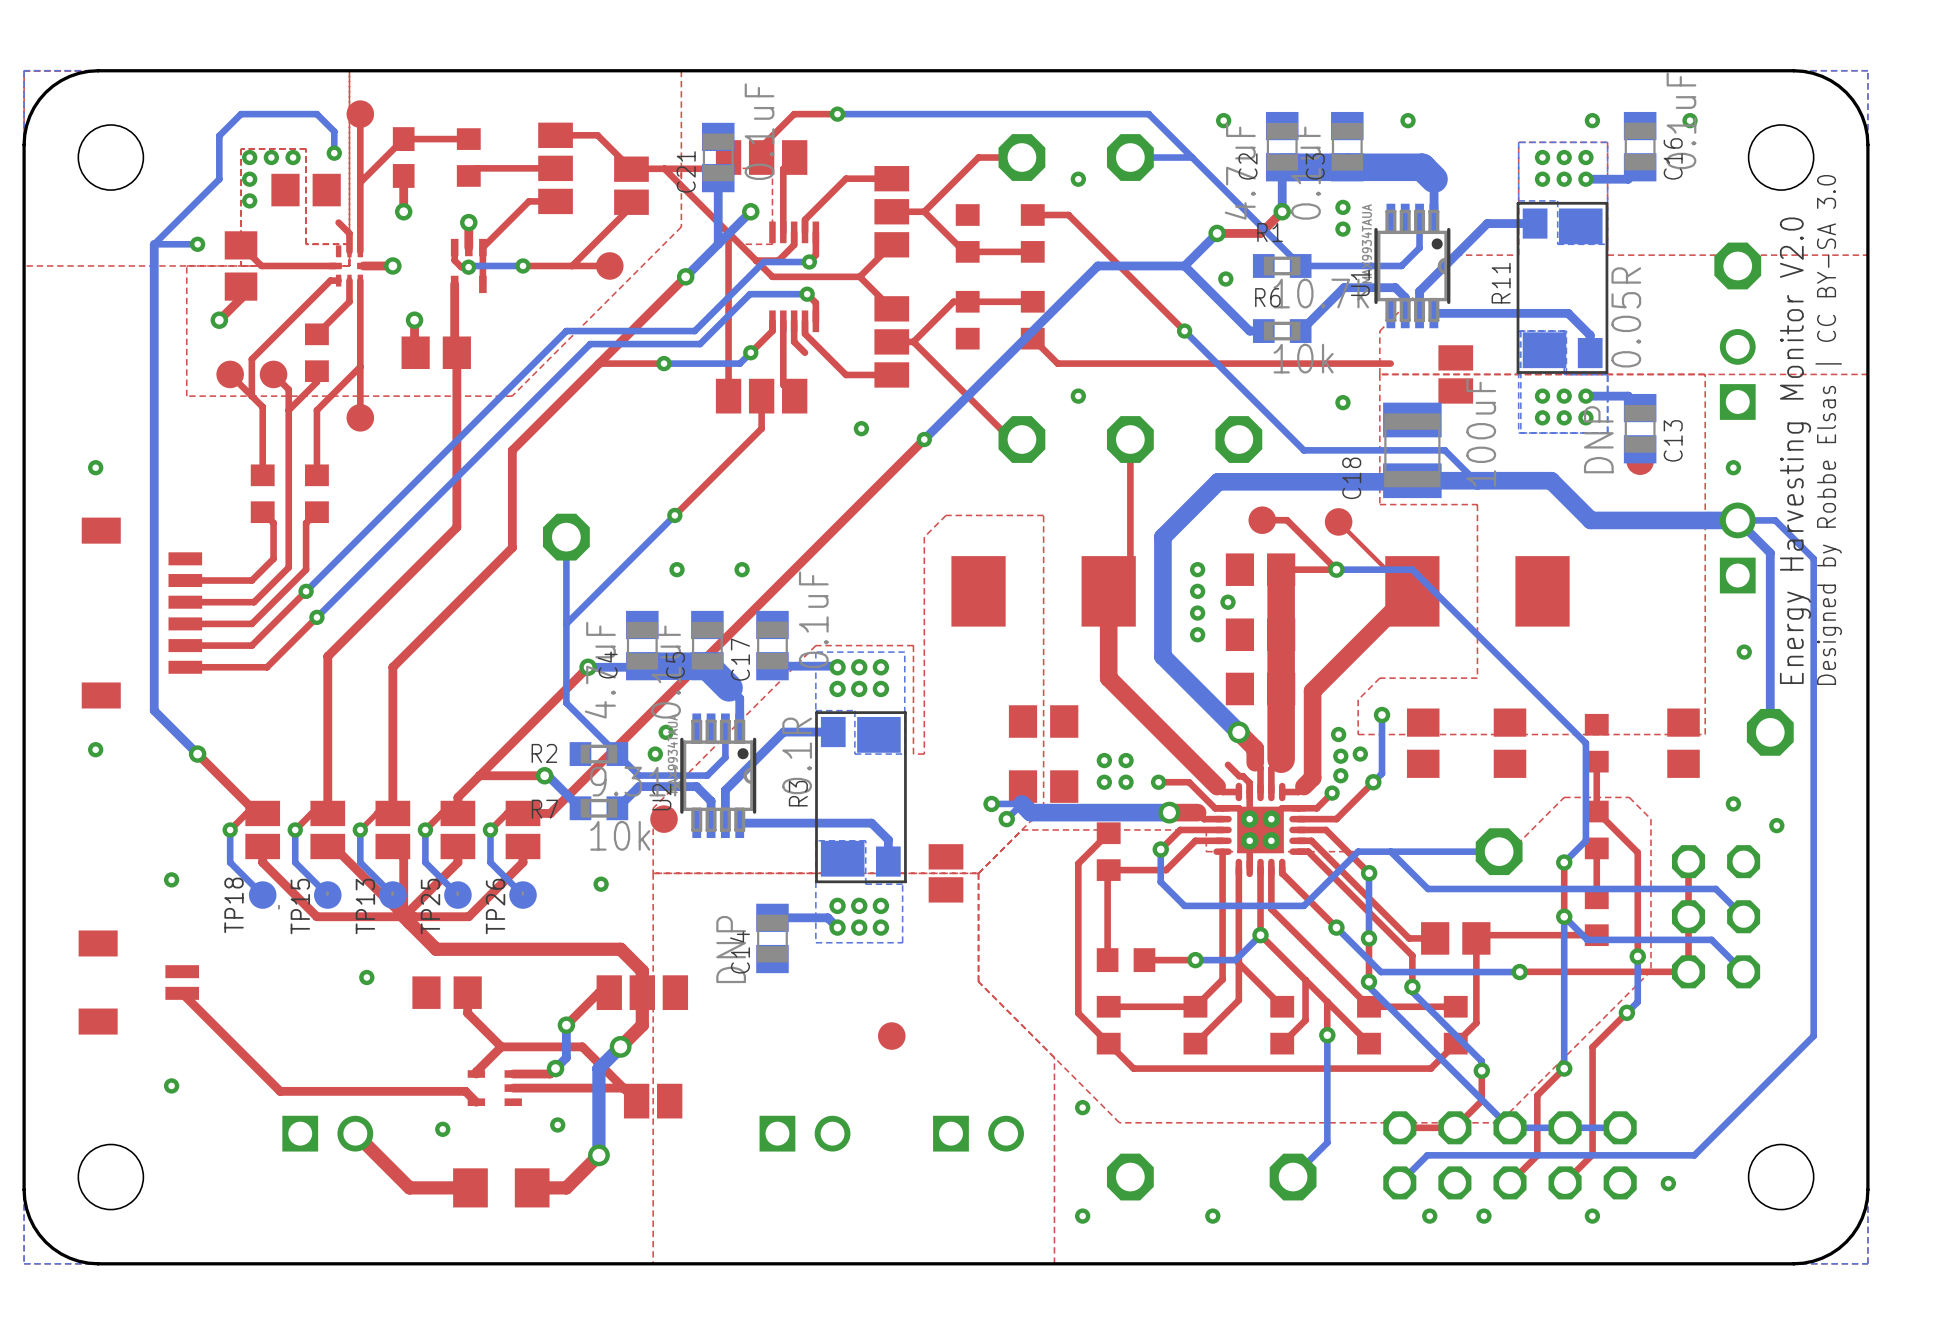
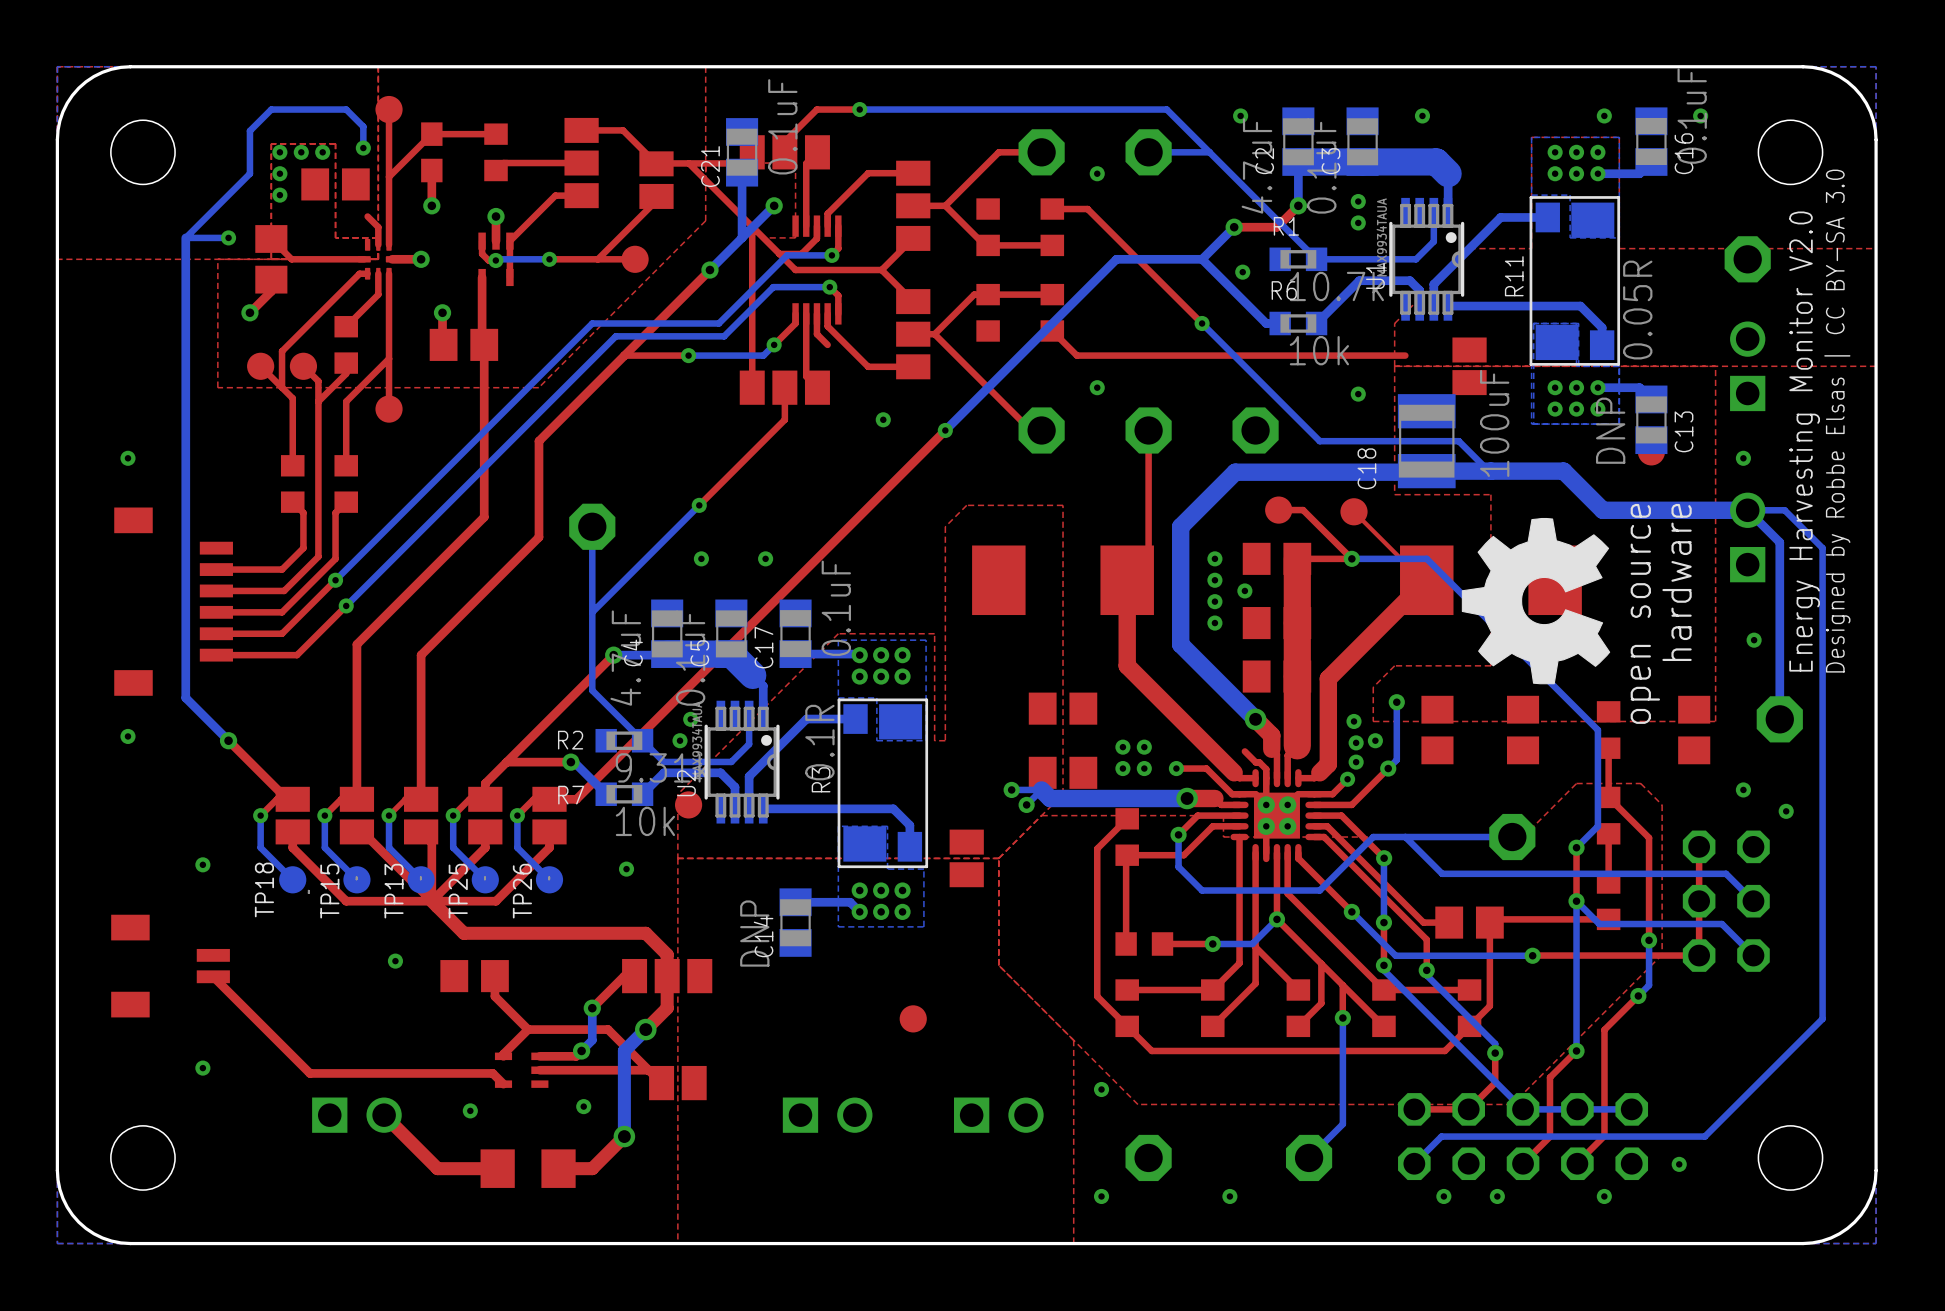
drawing: none -> [1461, 517, 1611, 685]

